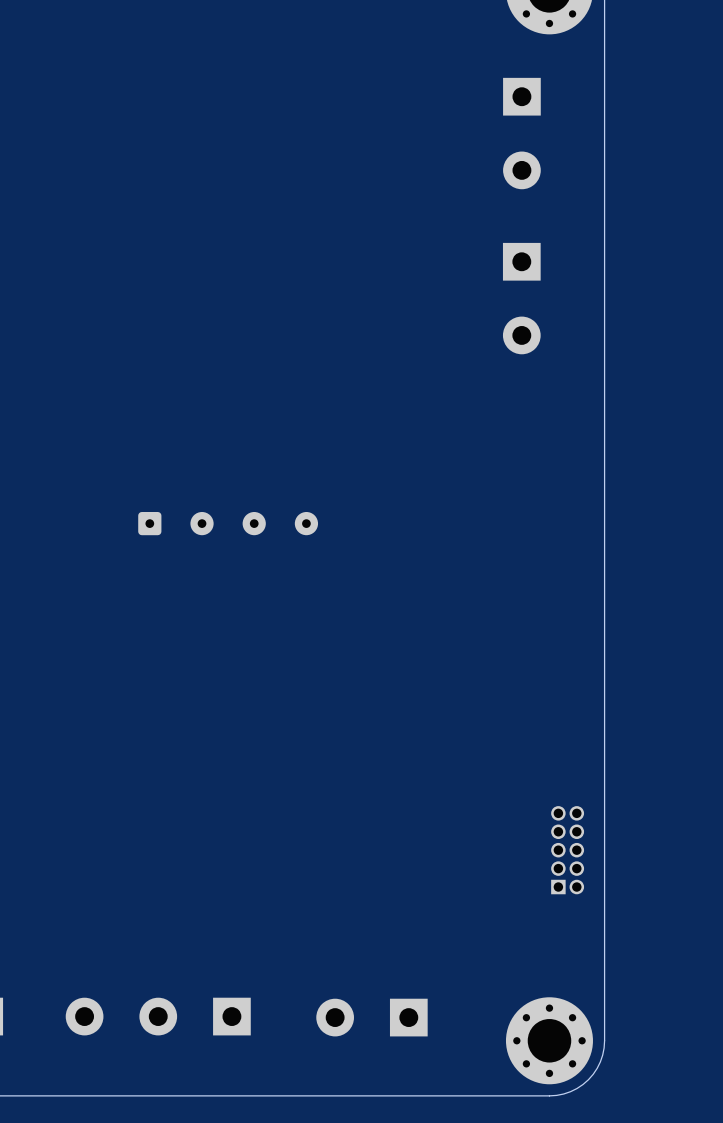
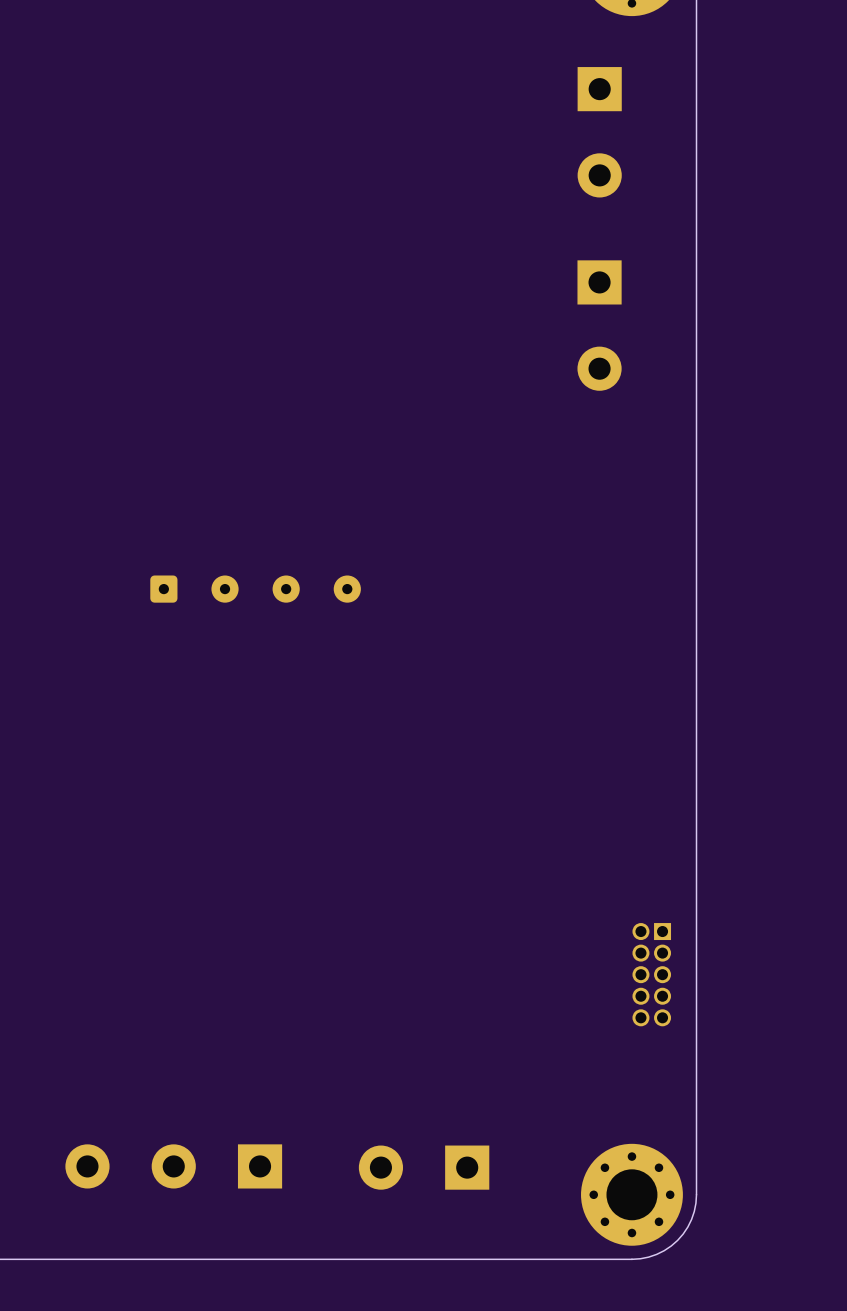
part rotation: 0° (567, 850) -> 180° (651, 974)

